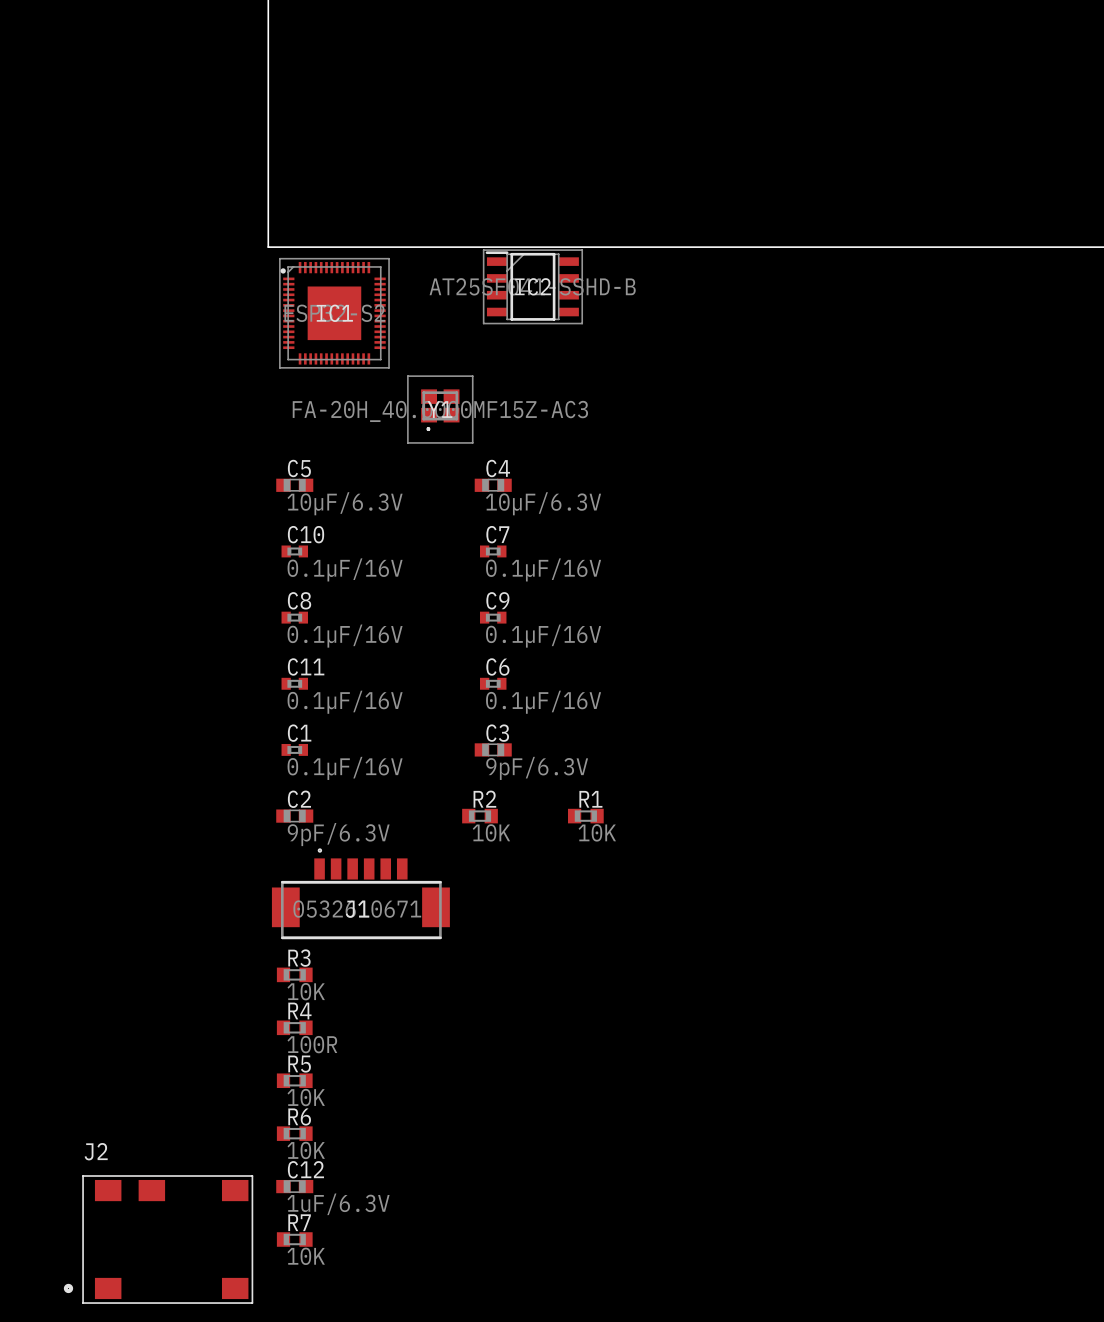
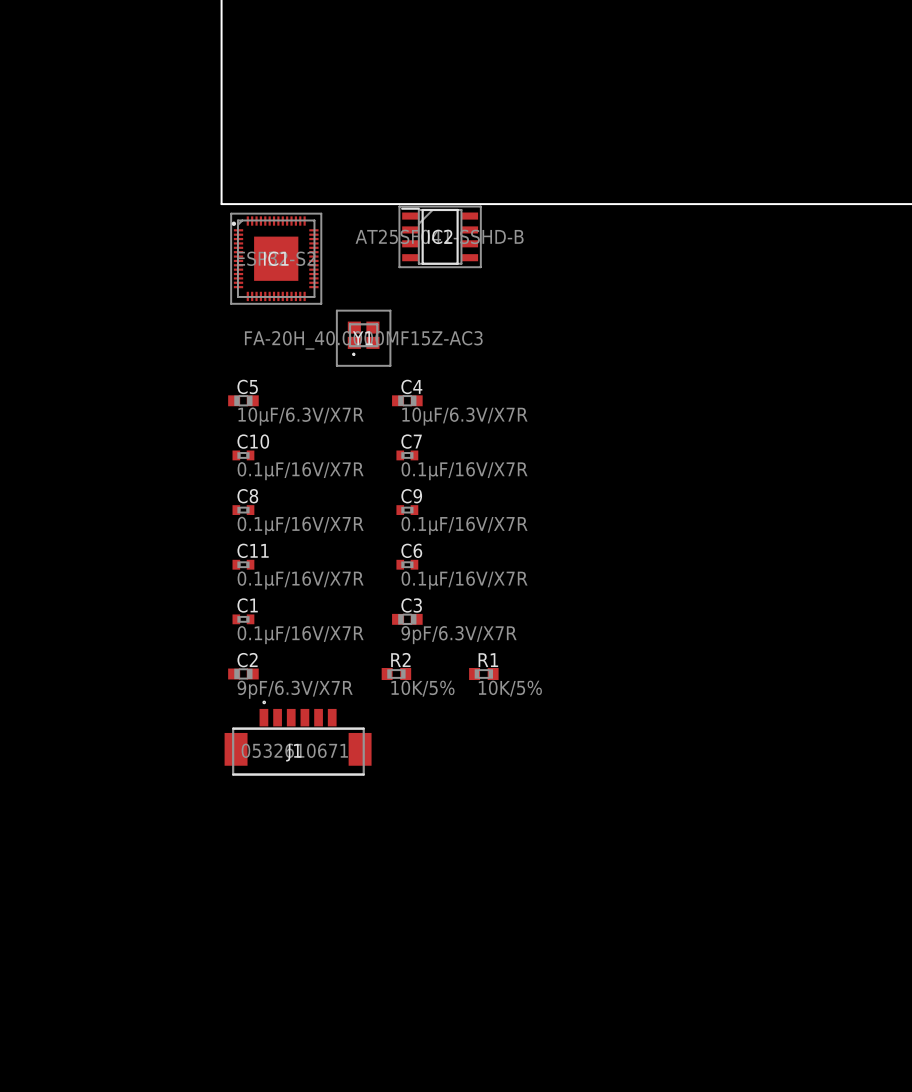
C5 value: 10µF/6.3V (345, 503) -> 10µF/6.3V/X7R (300, 416)
C4 value: 10µF/6.3V (543, 503) -> 10µF/6.3V/X7R (464, 416)
C10 value: 0.1µF/16V (345, 569) -> 0.1µF/16V/X7R (300, 471)
C7 value: 0.1µF/16V (543, 569) -> 0.1µF/16V/X7R (464, 471)
C8 value: 0.1µF/16V (345, 636) -> 0.1µF/16V/X7R (300, 525)
C9 value: 0.1µF/16V (543, 636) -> 0.1µF/16V/X7R (464, 525)
C11 value: 0.1µF/16V (345, 702) -> 0.1µF/16V/X7R (300, 580)
C6 value: 0.1µF/16V (543, 702) -> 0.1µF/16V/X7R (464, 580)
C1 value: 0.1µF/16V (345, 768) -> 0.1µF/16V/X7R (300, 635)
C3 value: 9pF/6.3V (537, 768) -> 9pF/6.3V/X7R (459, 635)
R2 value: 10K (491, 832) -> 10K/5% (422, 688)
R1 value: 10K (597, 832) -> 10K/5% (510, 688)
C2 value: 9pF/6.3V (338, 834) -> 9pF/6.3V/X7R (295, 689)
R3: 10K (294, 974) -> none
R4: 100R (294, 1027) -> none
R5: 10K (294, 1080) -> none
R6: 10K (294, 1133) -> none
C12: 1uF/6.3V (294, 1186) -> none
J2: (158, 1239) -> none
R7: 10K (294, 1239) -> none

